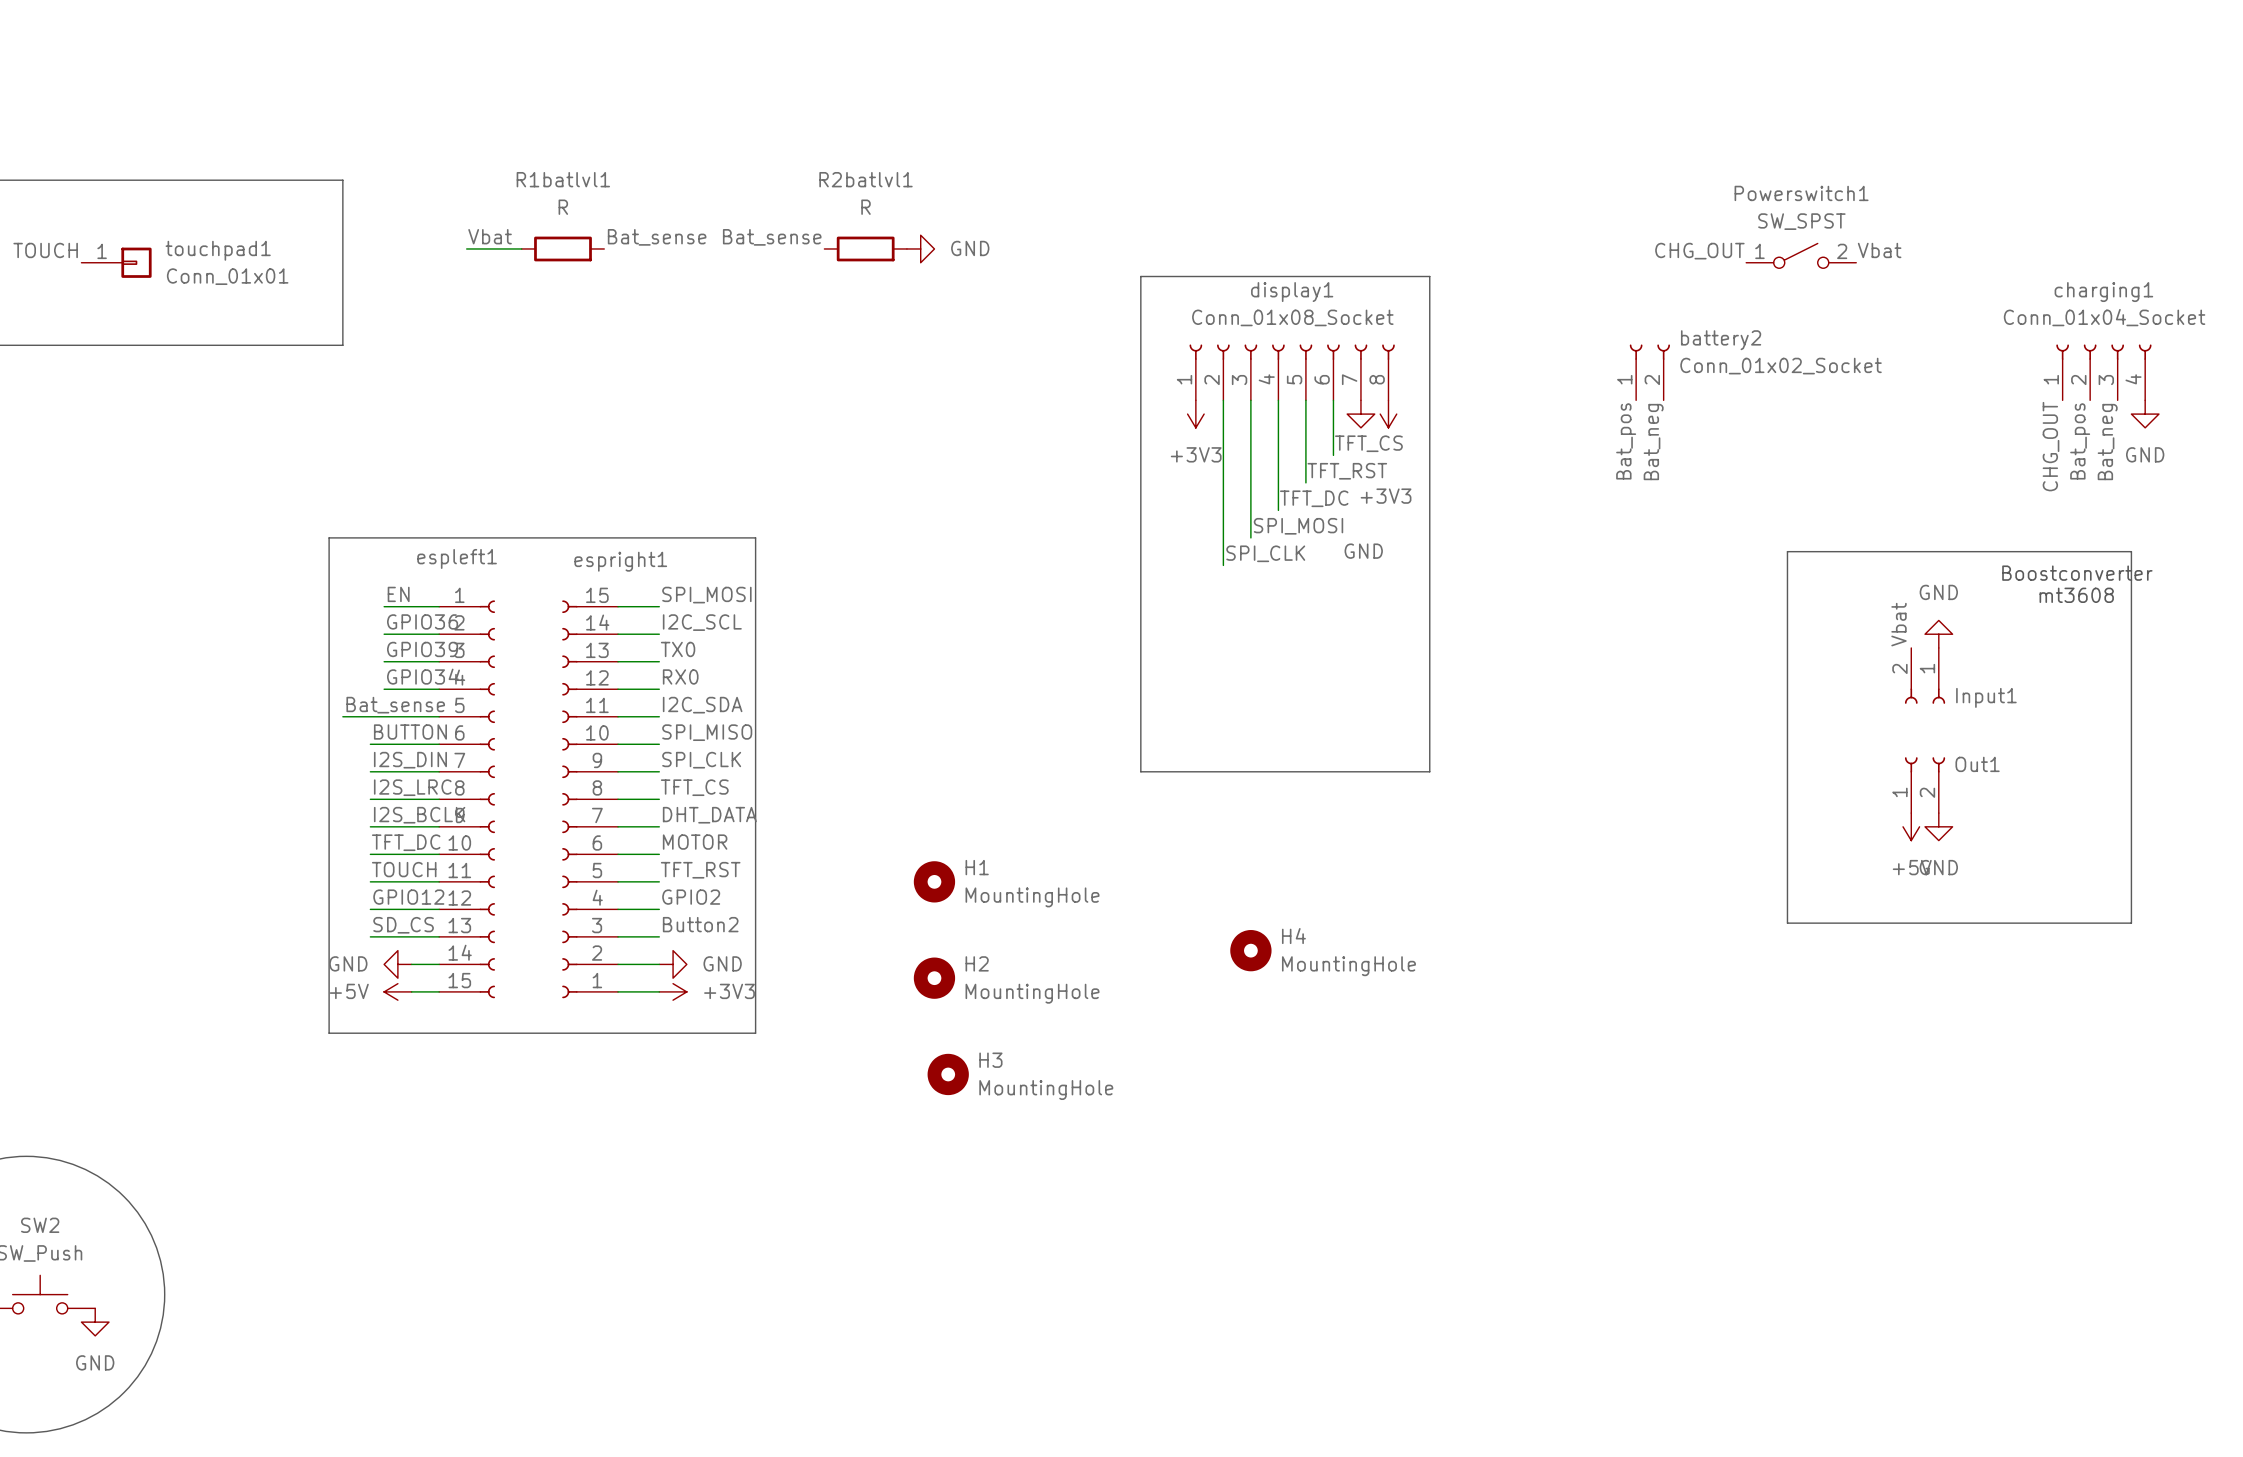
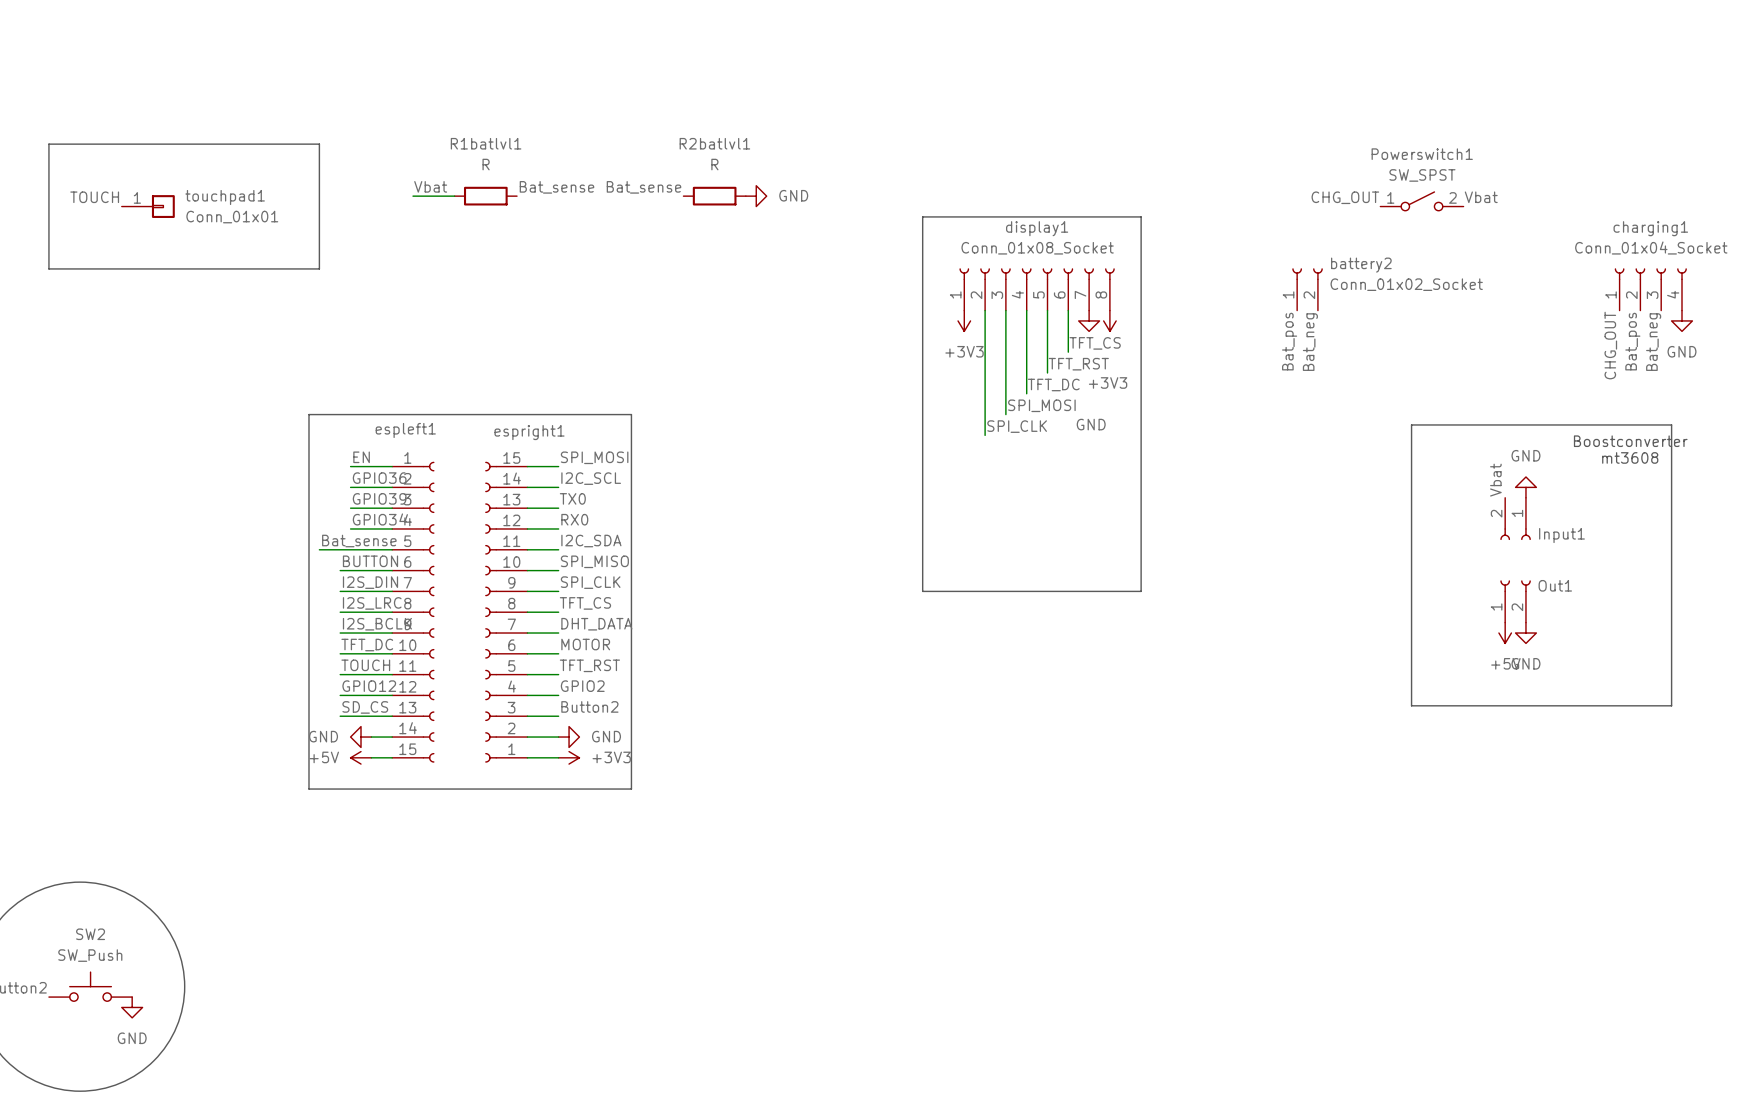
H1: MountingHole (934, 881) -> none
H4: MountingHole (1250, 950) -> none
H2: MountingHole (934, 978) -> none
H3: MountingHole (948, 1074) -> none

